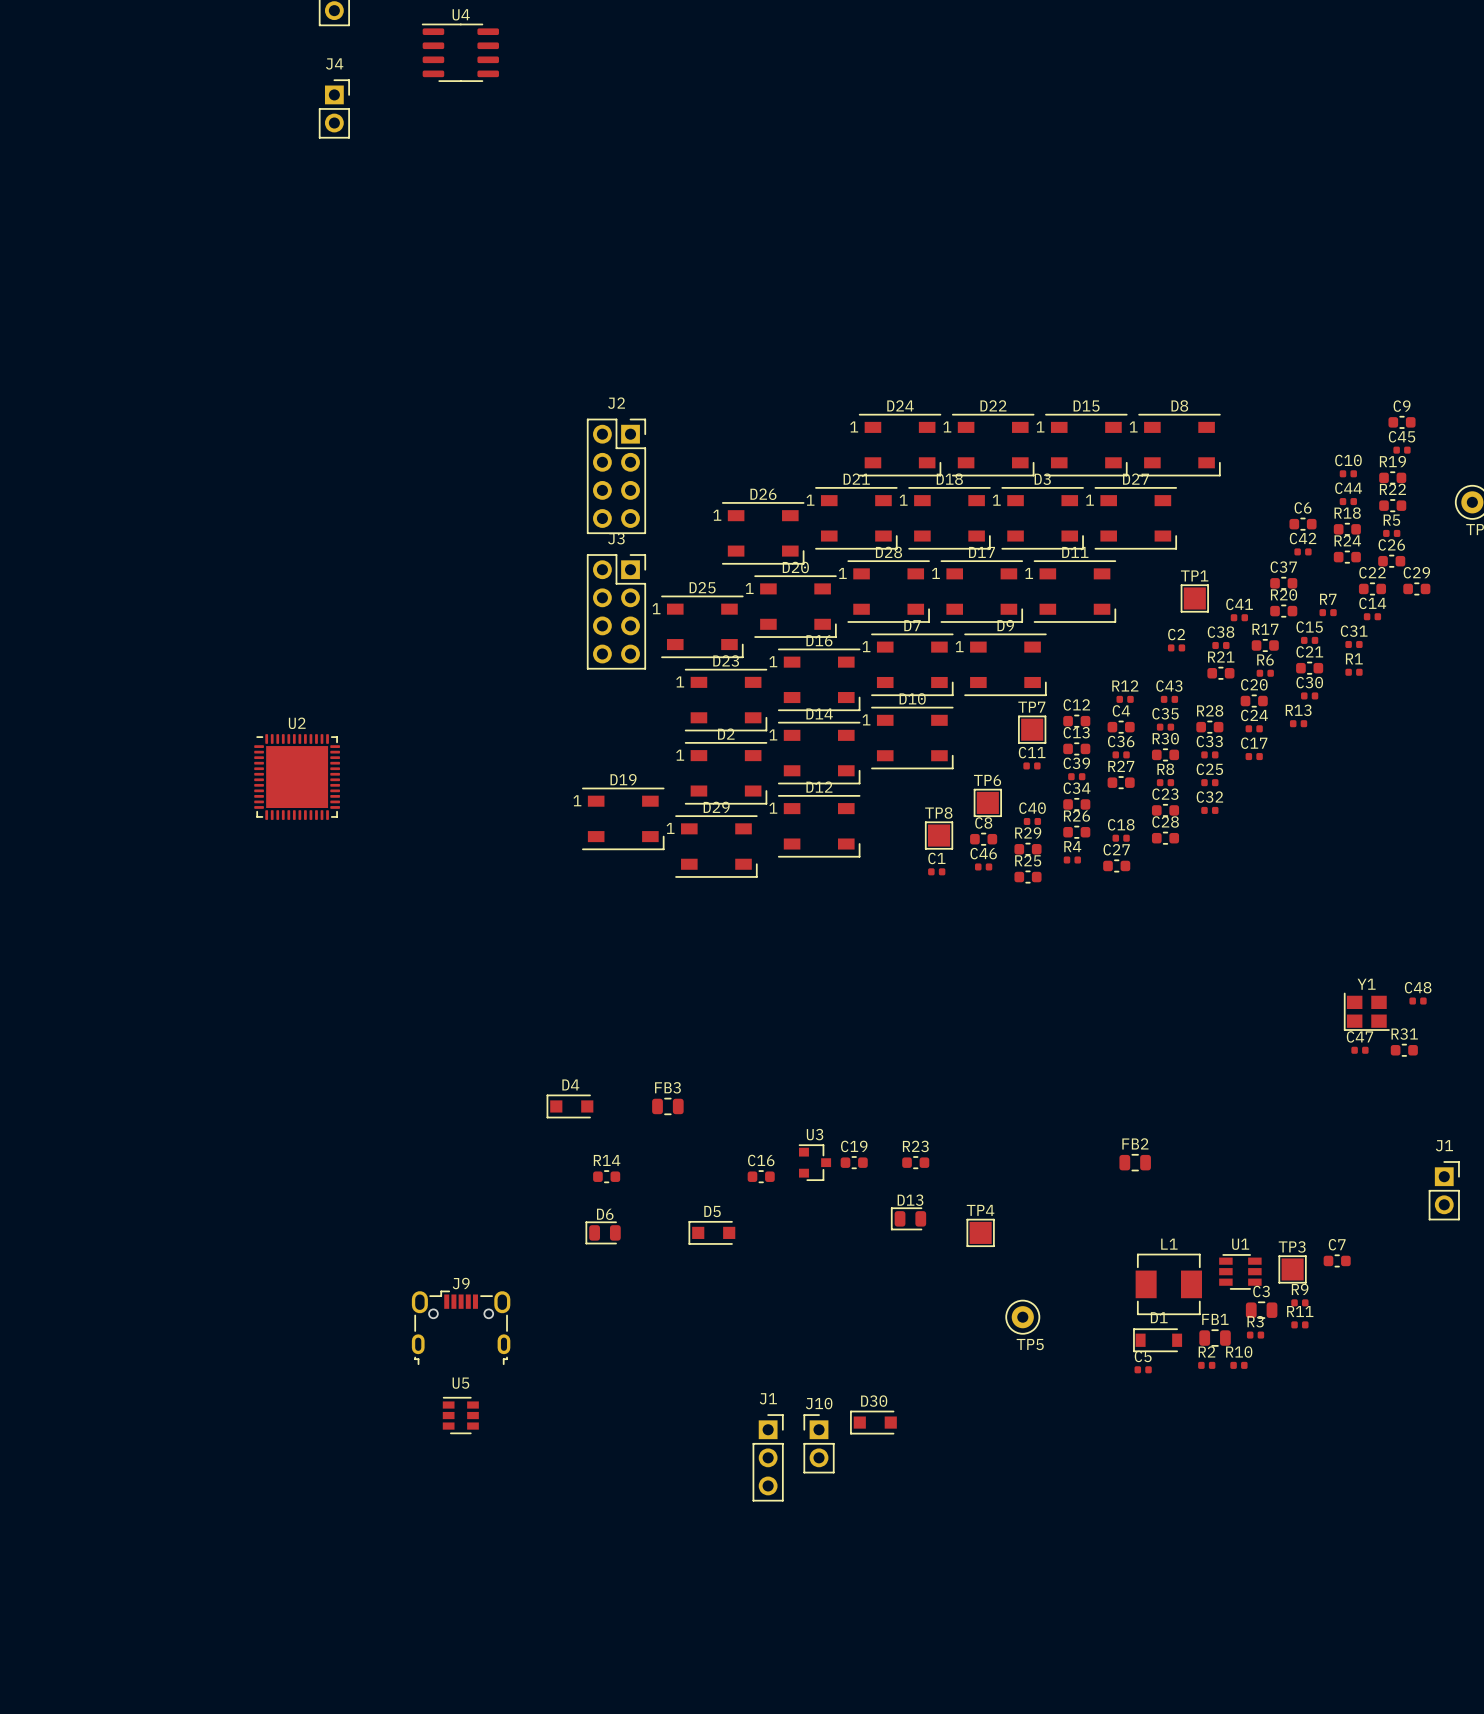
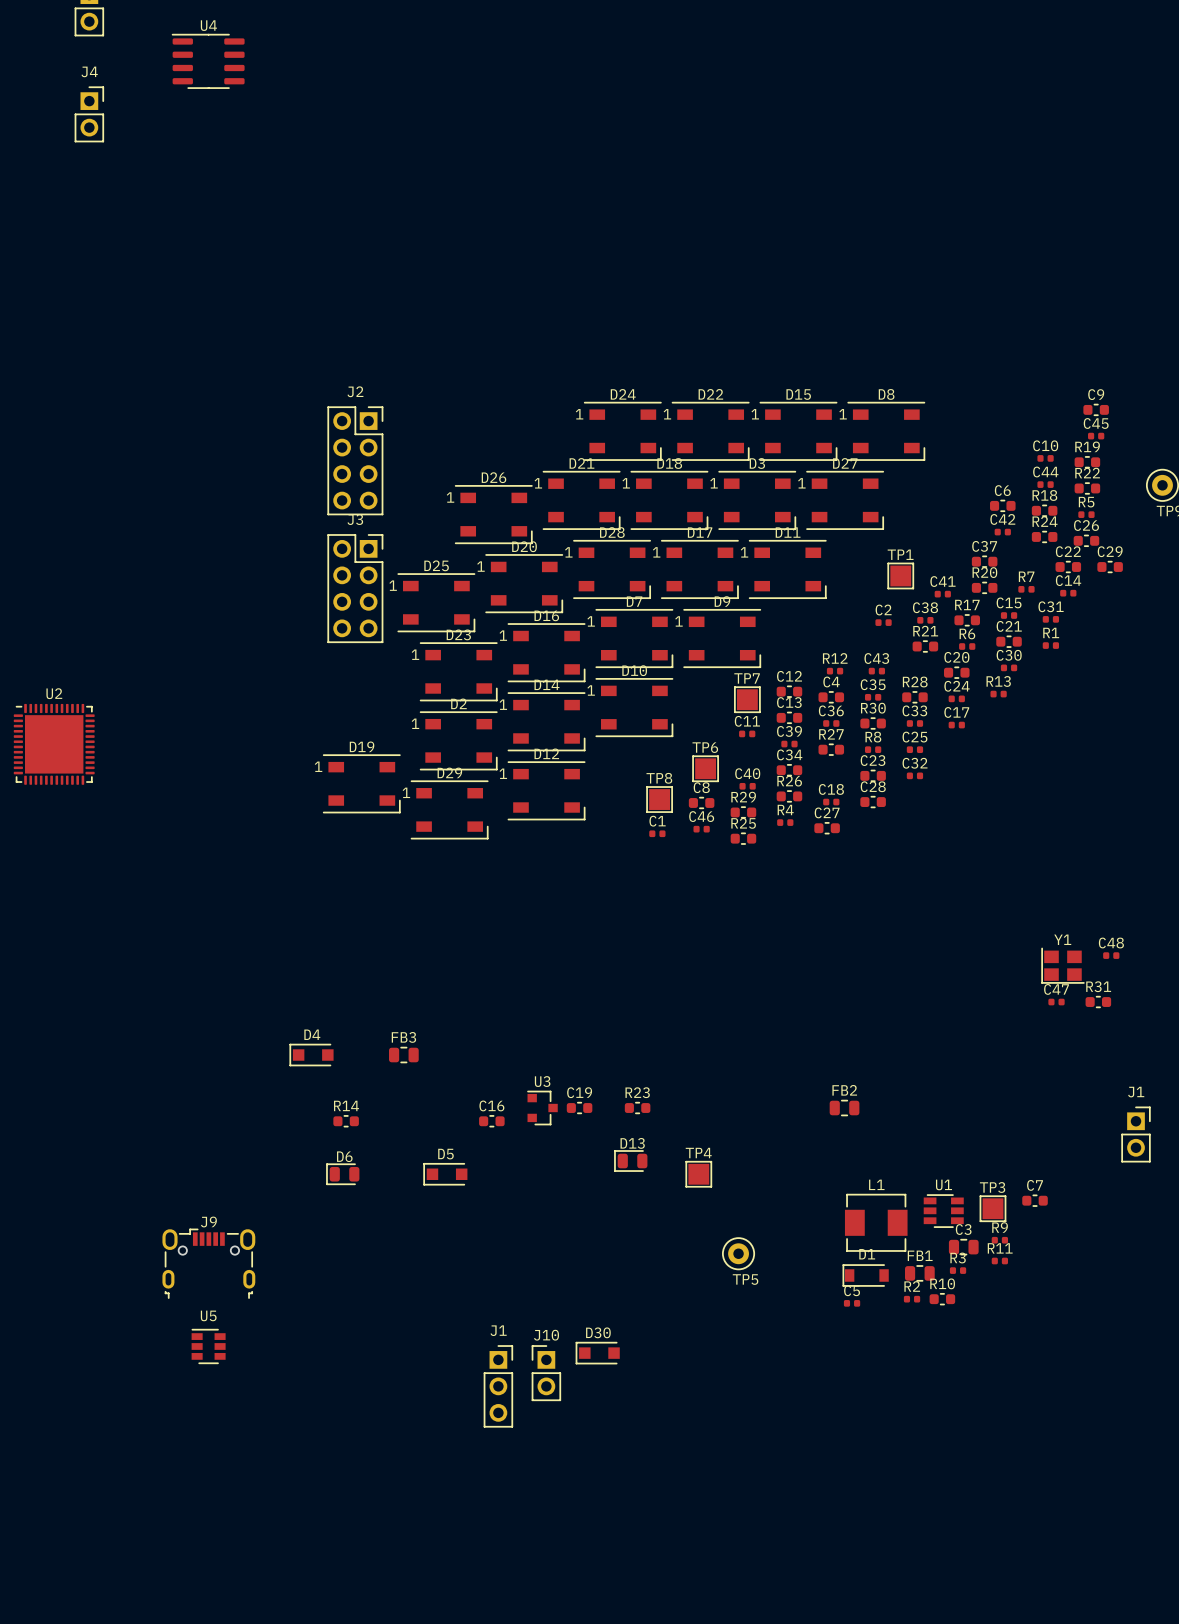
R10 footprint: [1230, 1361, 1248, 1369] -> [929, 1293, 956, 1306]

